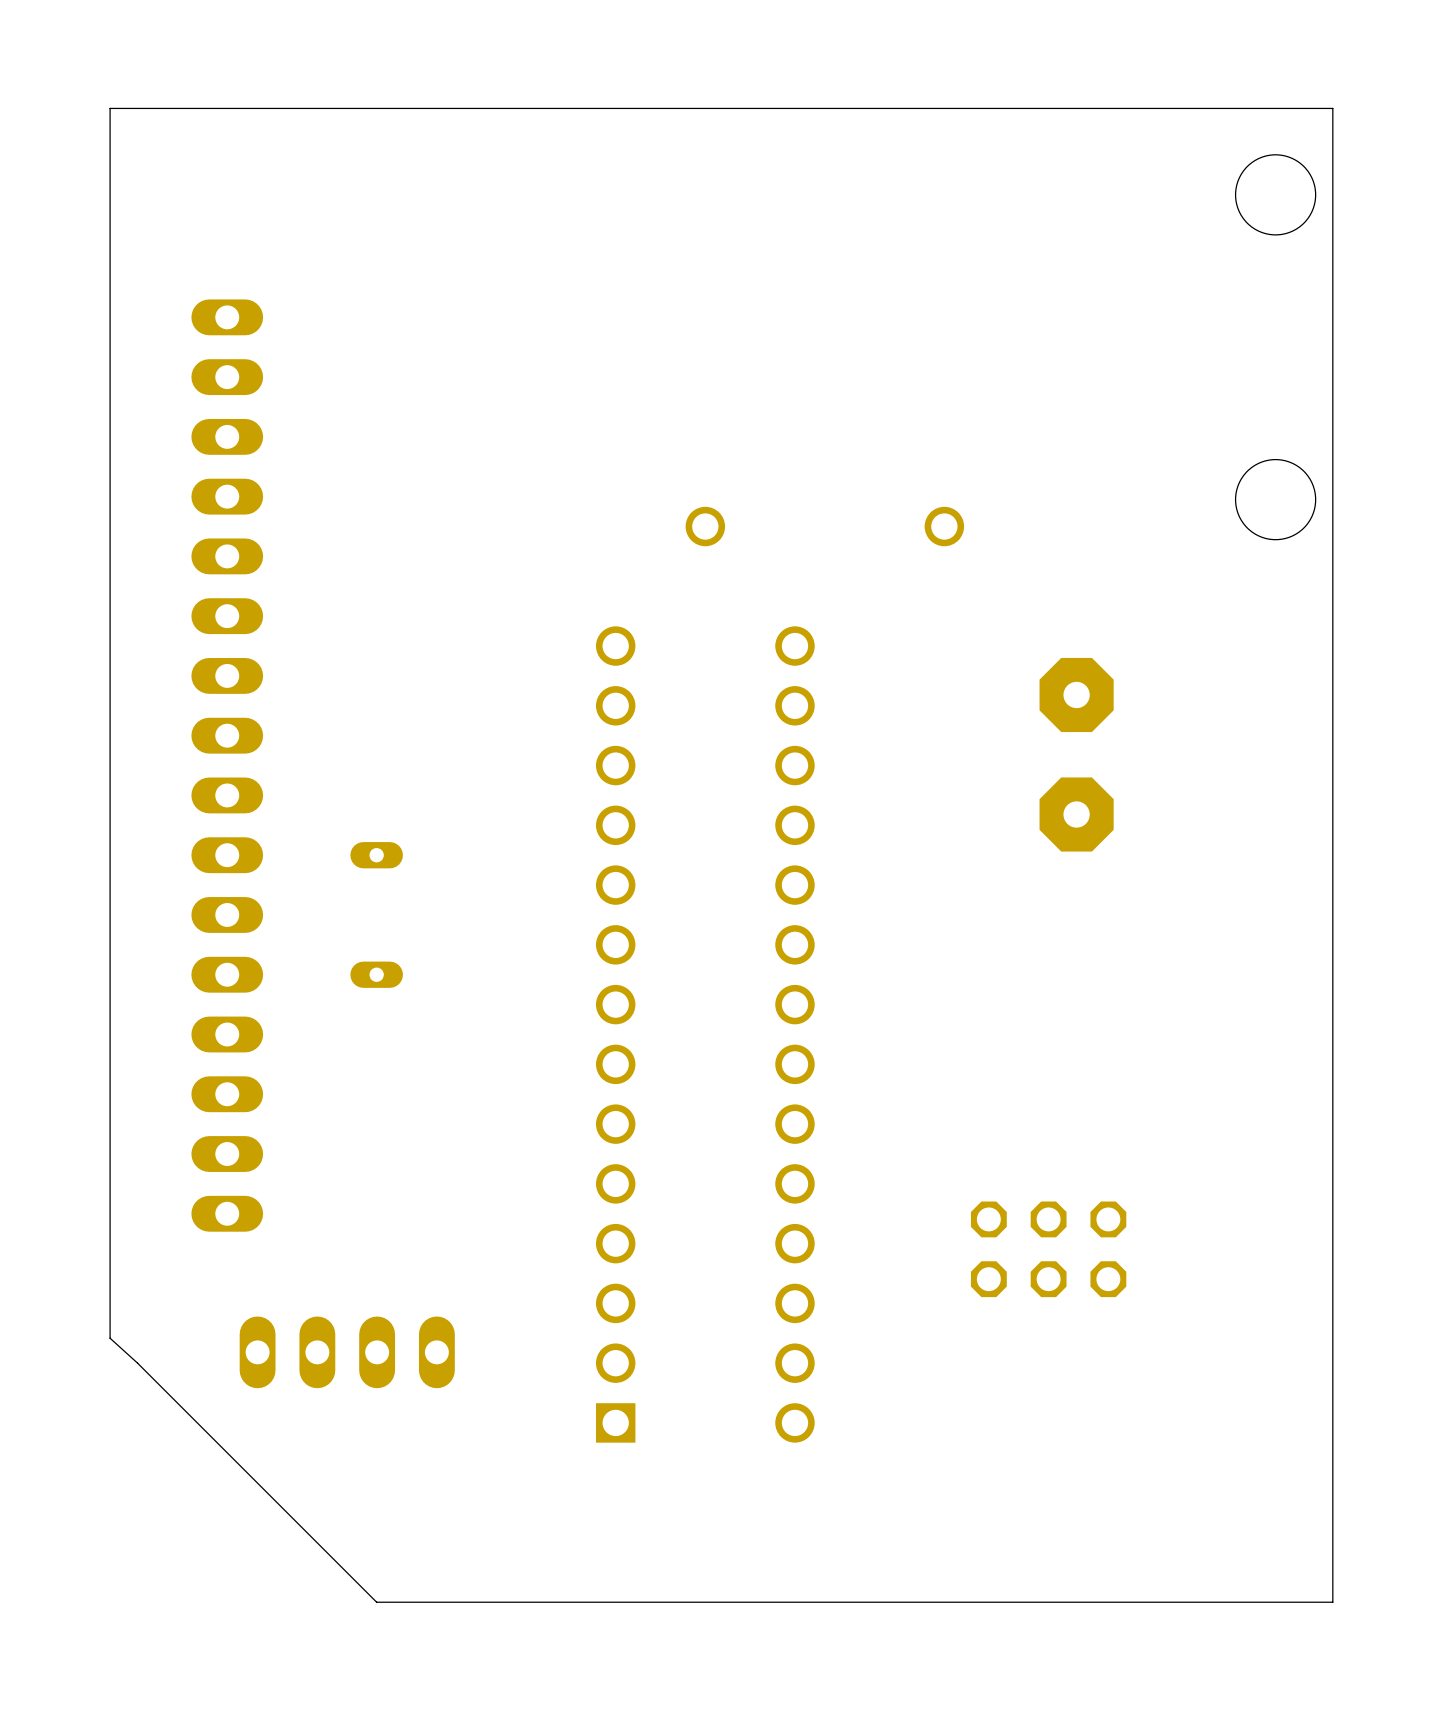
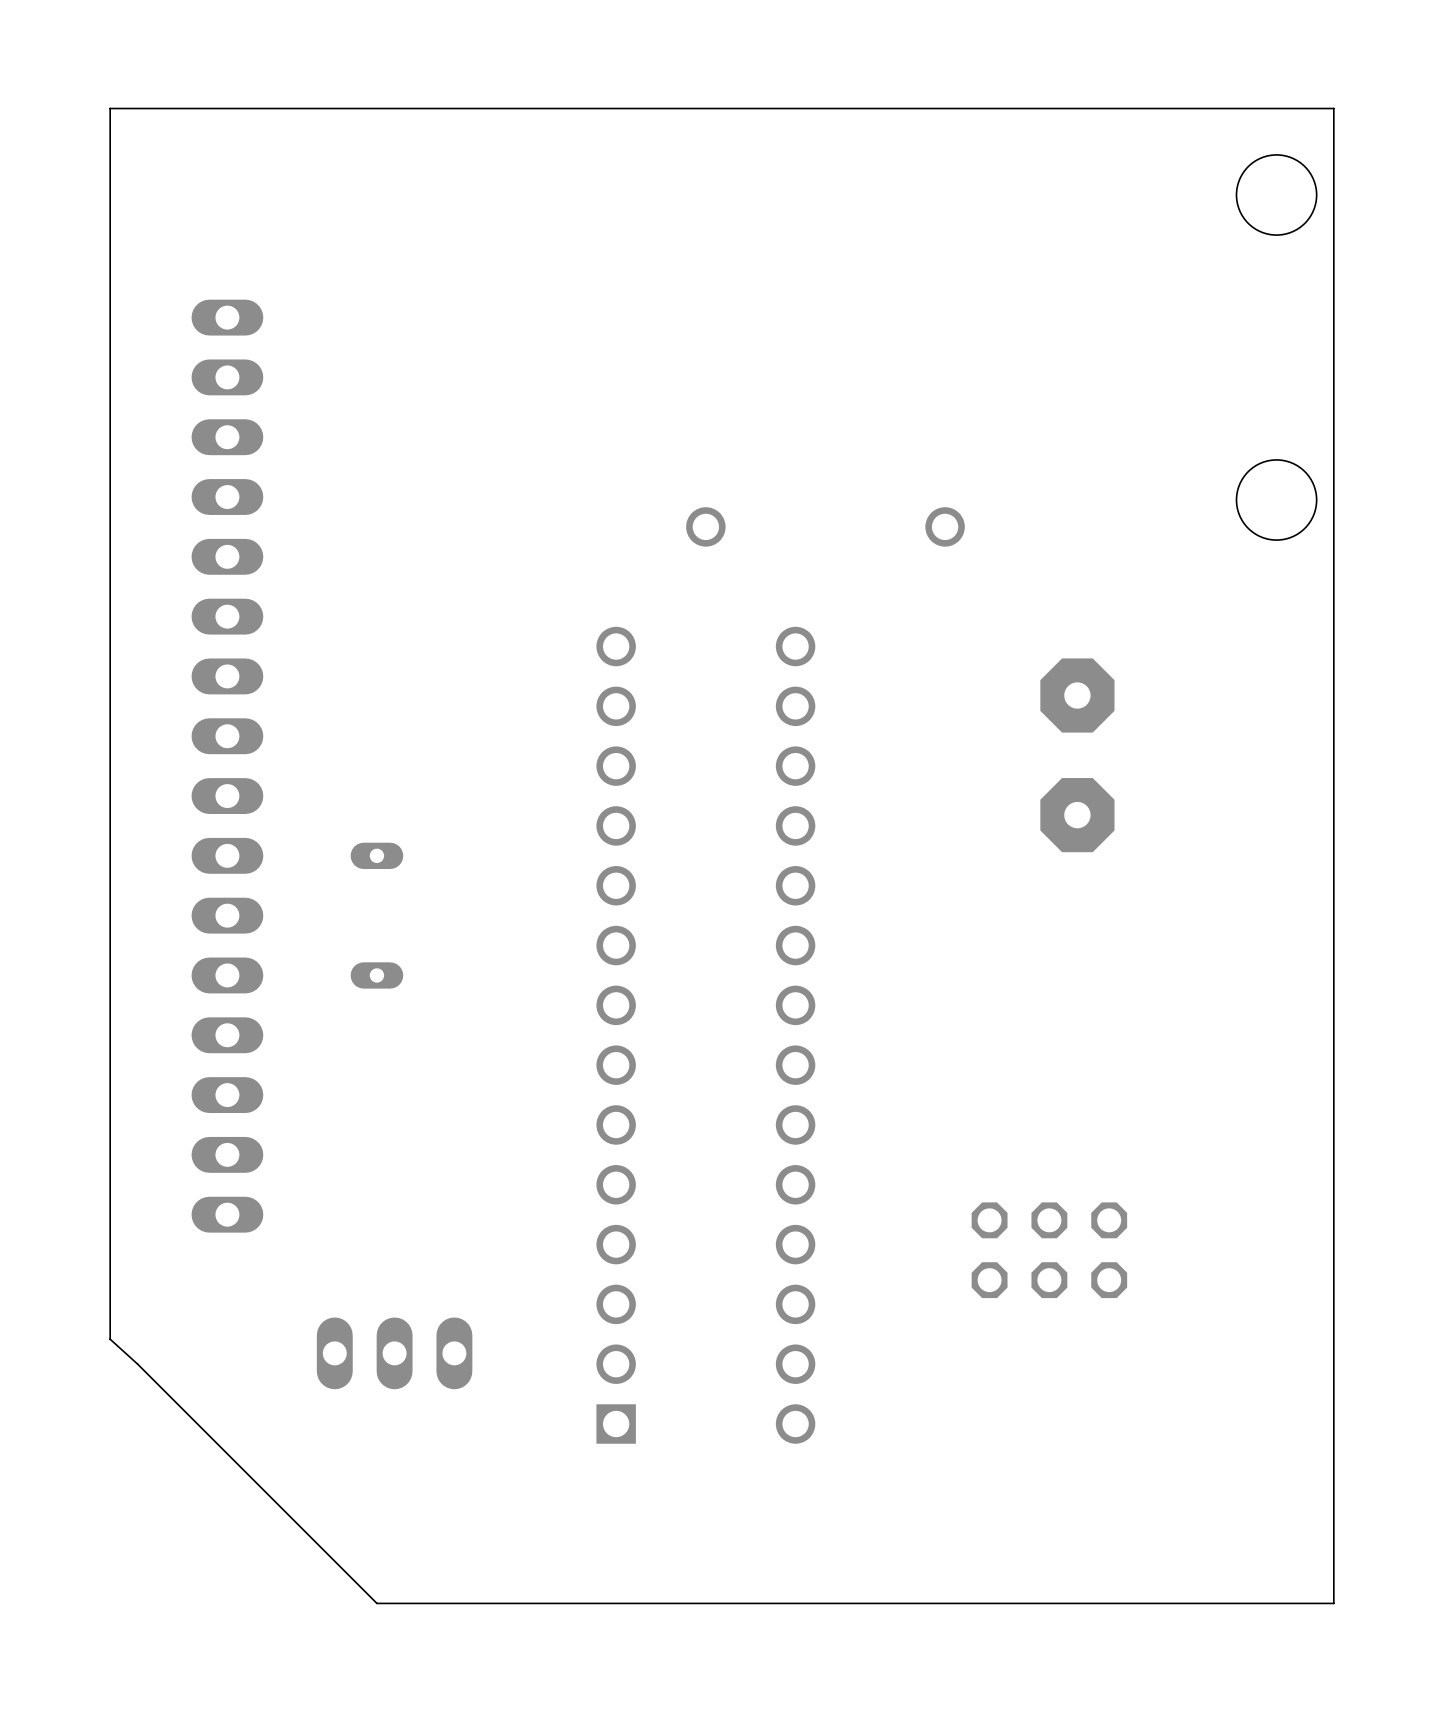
part: (347, 1352) -> none
part: none -> (394, 1353)

